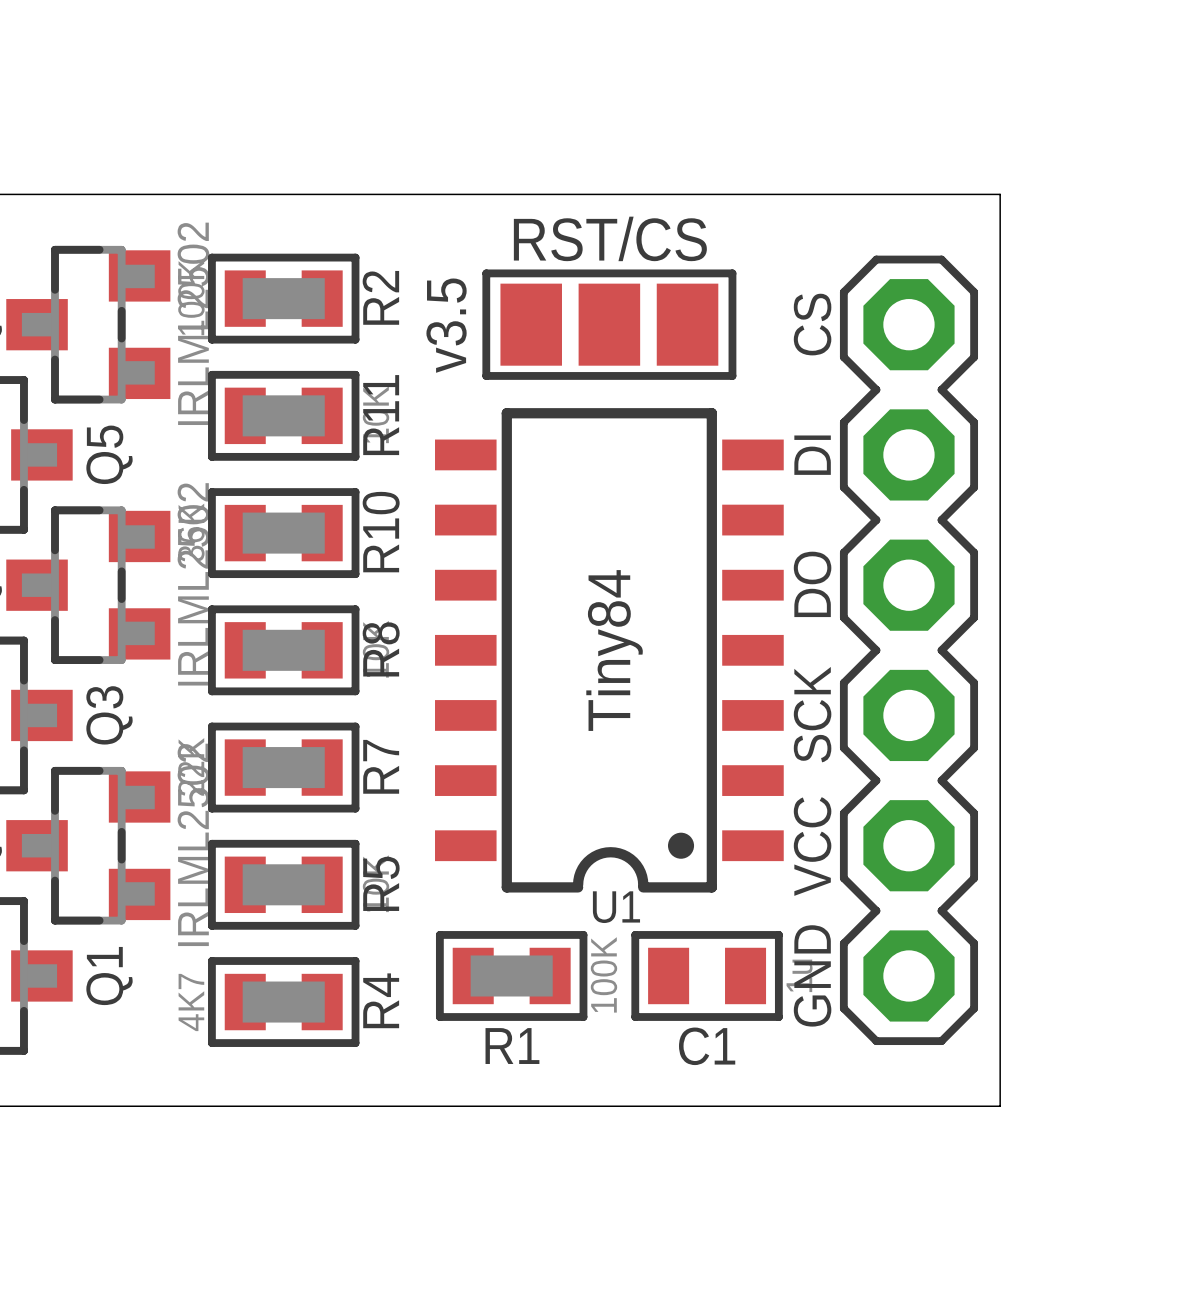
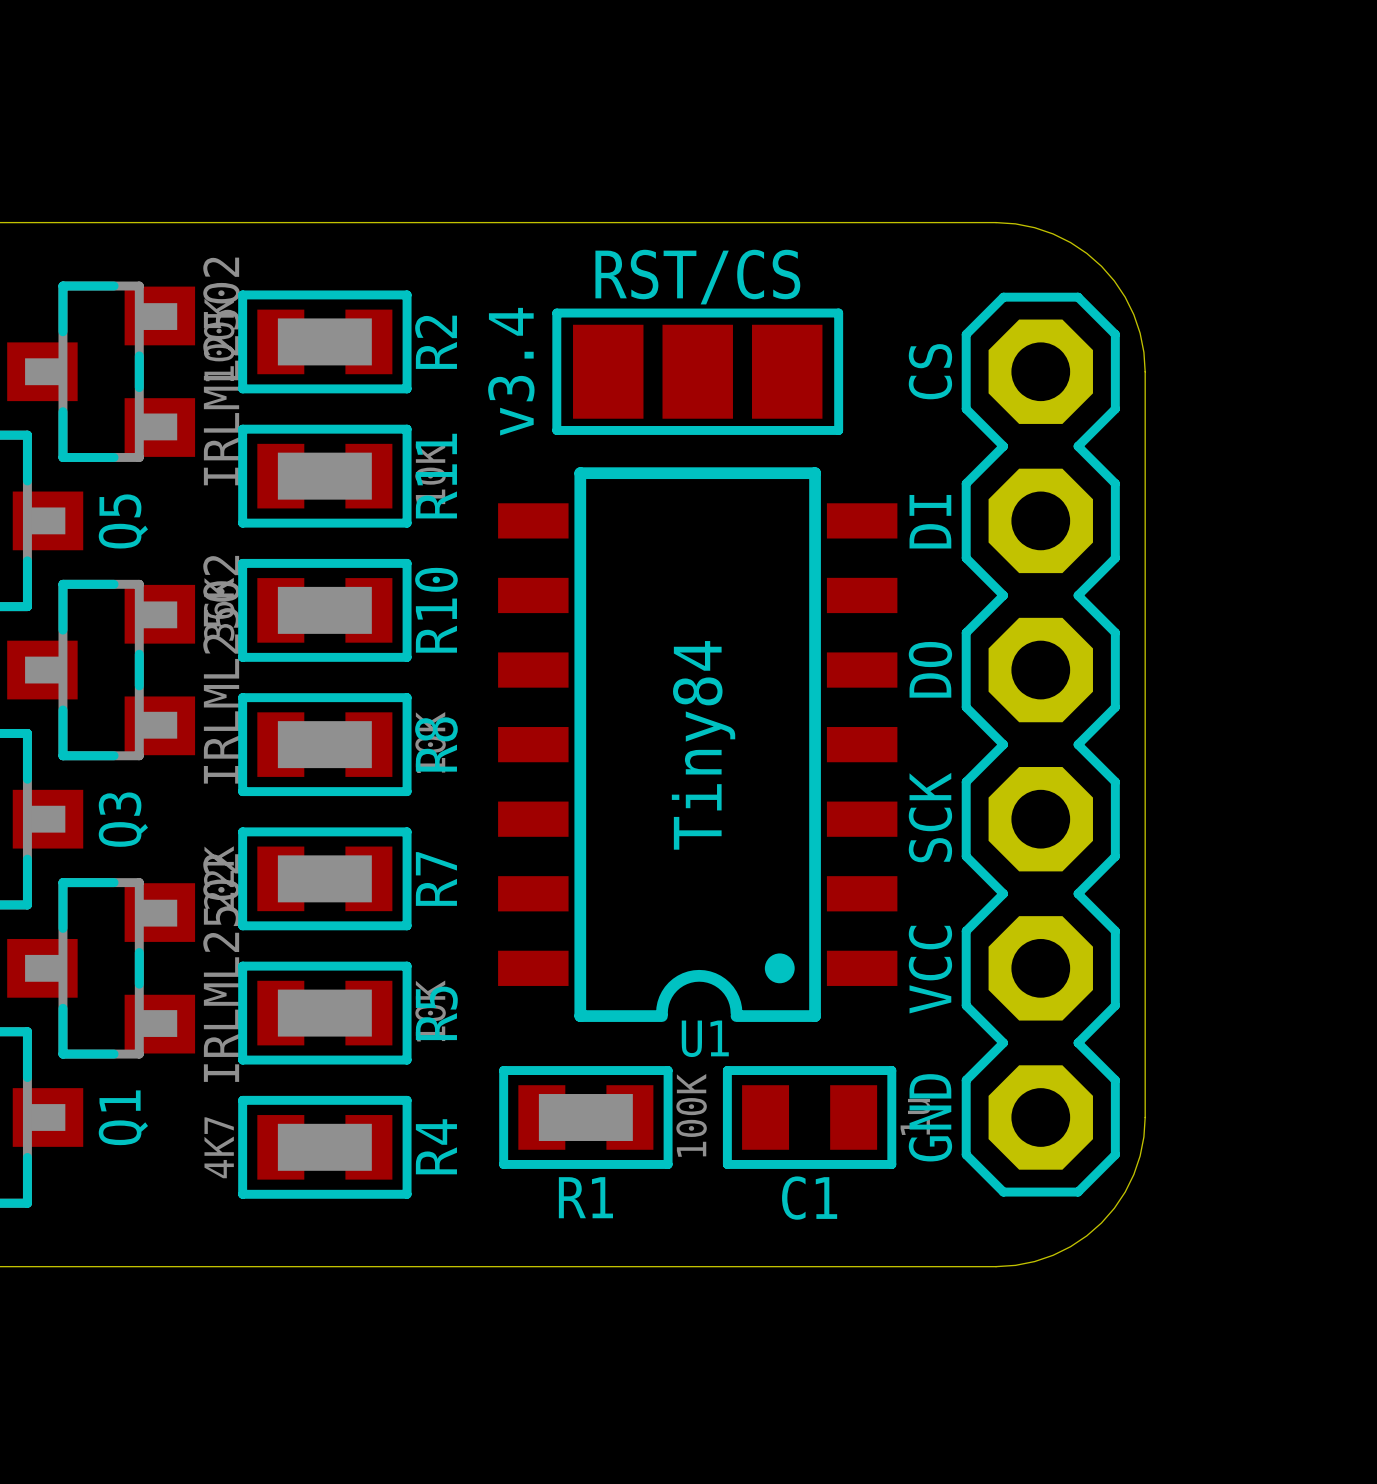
board edge: (869, 194) (1000, 194) (1000, 324) -> (996, 222) (1034, 227) (1053, 233) (1086, 253) (1101, 266) (1114, 280) (1133, 314) (1140, 333) (1145, 371)
text: v3.5 (446, 325) -> v3.4 (511, 371)
board edge: (1000, 975) (1000, 1106) (869, 1106) -> (1145, 1117) (1140, 1156) (1133, 1174) (1114, 1208) (1101, 1222) (1086, 1235) (1053, 1255) (1034, 1261) (996, 1266)

